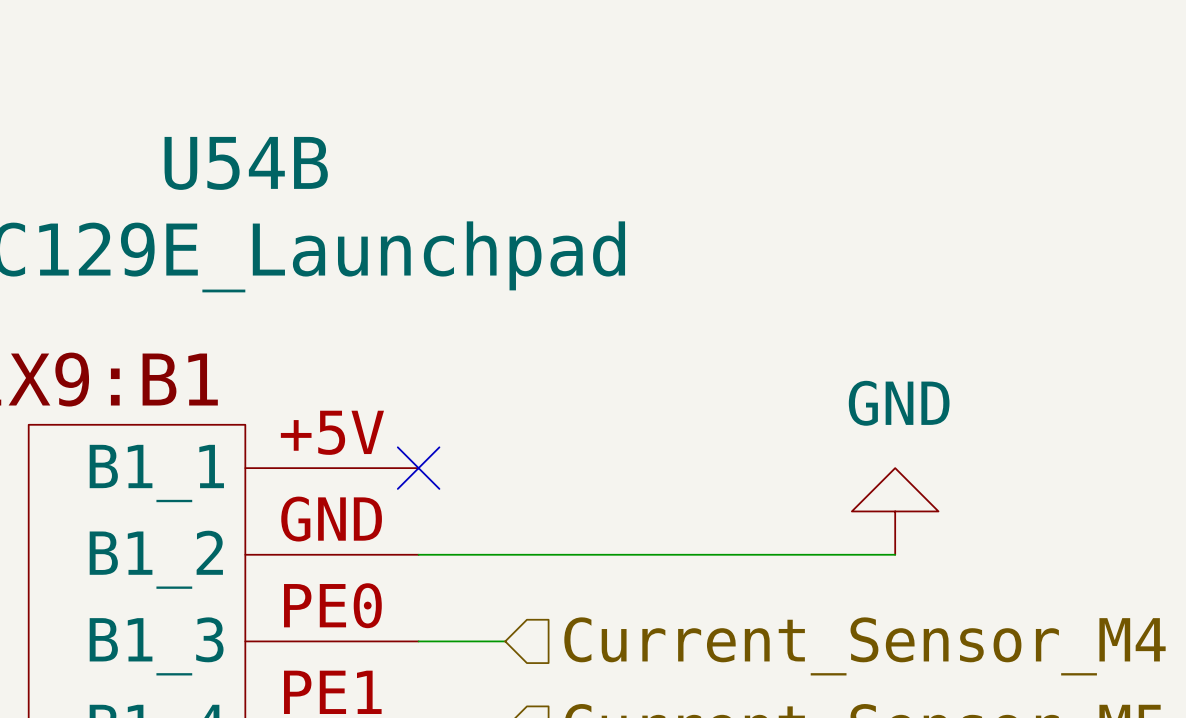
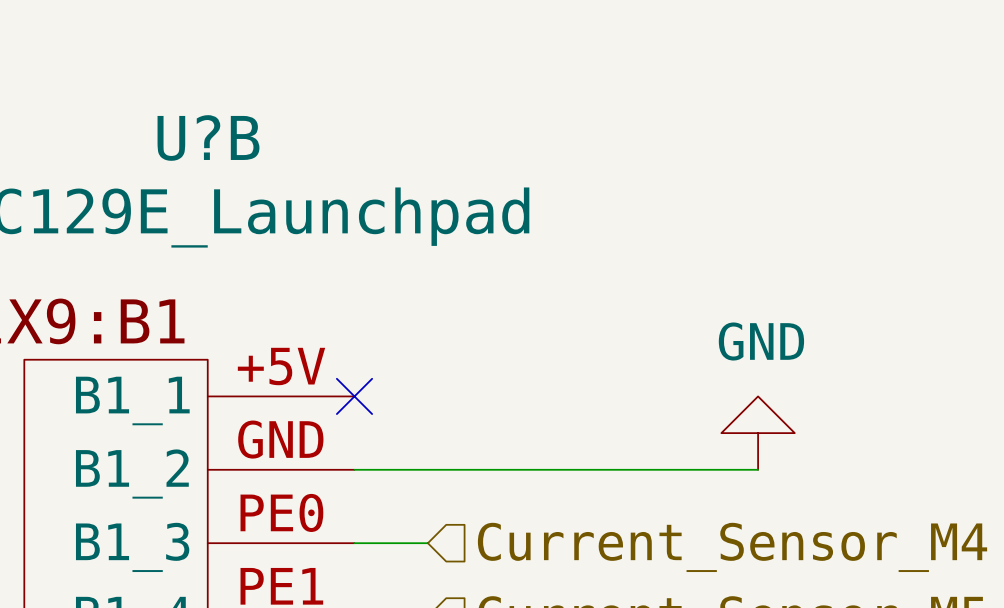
U54B name: U54B (246, 163) -> U?B (208, 137)

